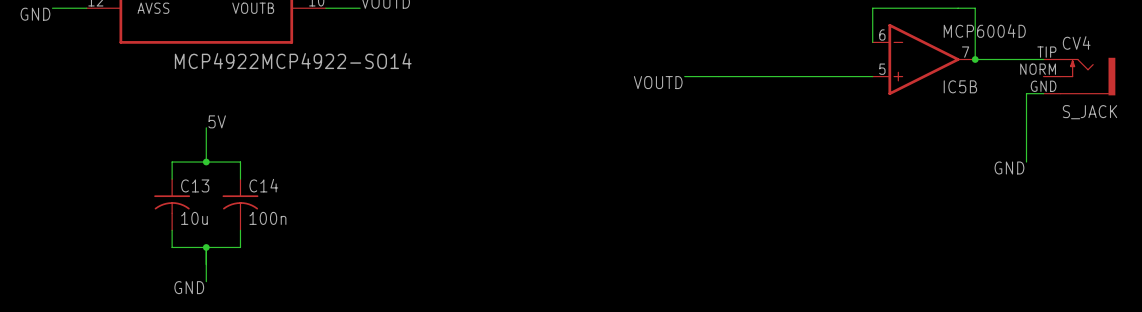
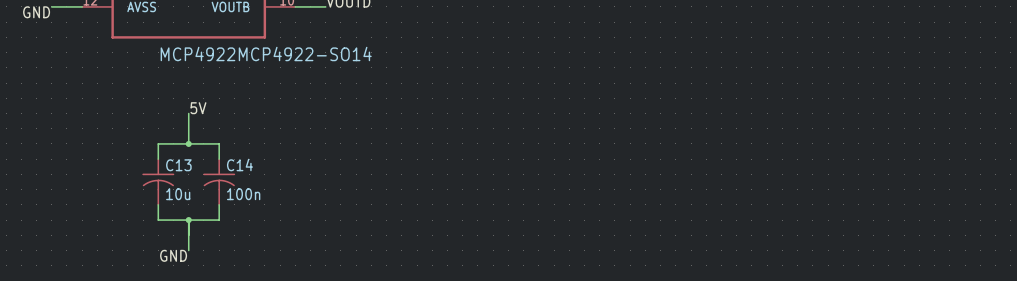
wire: (872, 42) (872, 8) (975, 8) (975, 59) (1043, 59) -> none
IC5B: MCP6004D (923, 59) -> none
junction: (975, 59) -> none
wire: (684, 76) (872, 76) -> none
CV4: S_JACK (1079, 76) -> none
label: VOUTD (658, 82) -> none
wire: (1043, 93) (1026, 93) (1026, 162) -> none
label: GND (1009, 168) -> none

